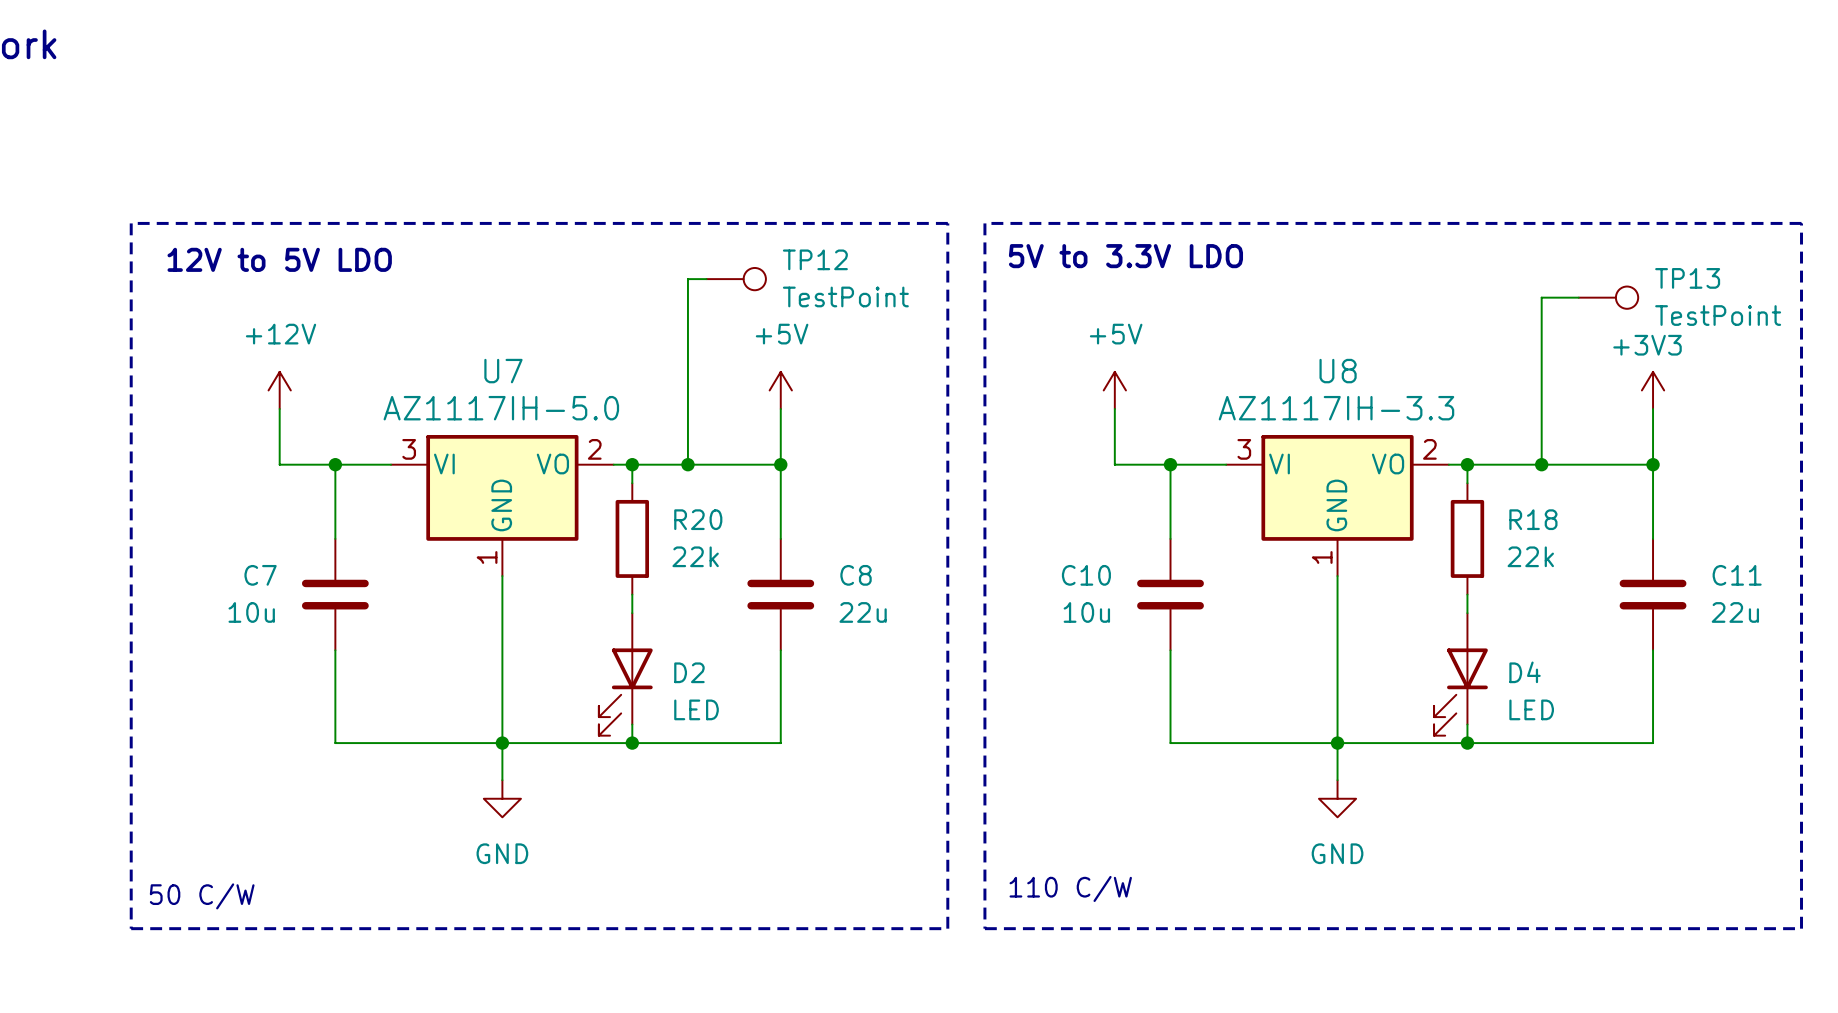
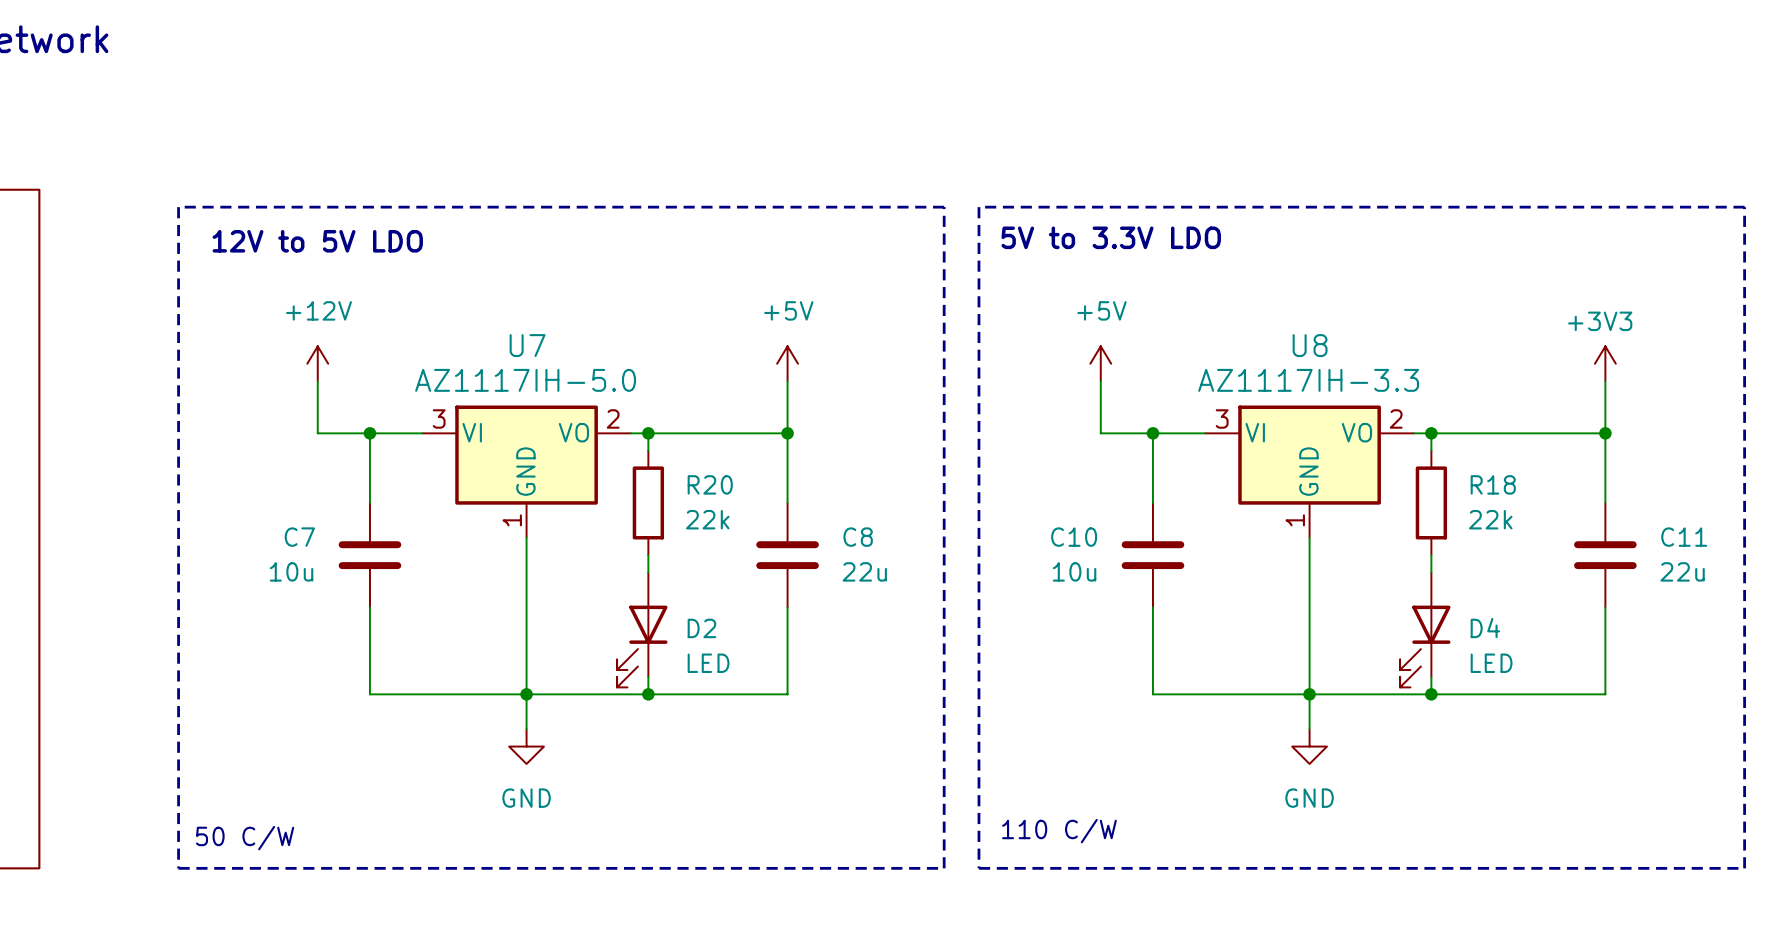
wire: (706, 279) (687, 279) (687, 464) -> none
TP12: TestPoint (736, 279) -> none
wire: (1578, 297) (1541, 297) (1541, 464) -> none
TP13: TestPoint (1608, 297) -> none
junction: (687, 464) -> none
junction: (1541, 464) -> none

